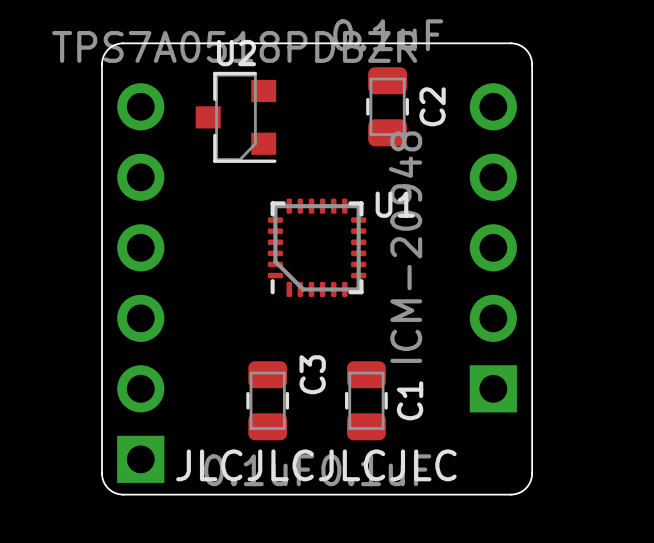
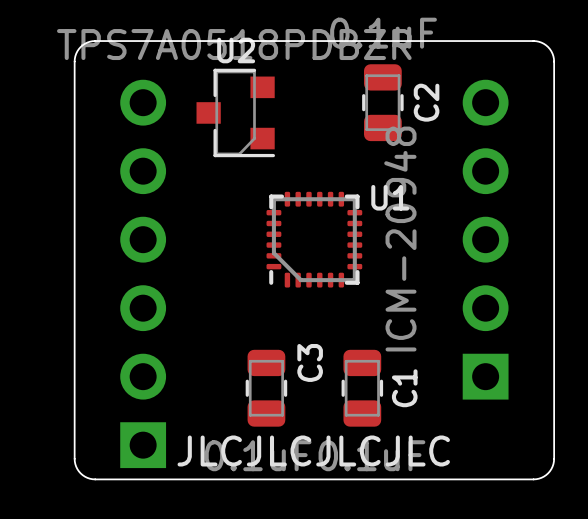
board edge: (123, 43) (115, 44) (108, 49) (103, 56) (101, 64) (101, 473) (103, 481) (108, 488) (115, 493) (123, 494) -> (126, 41) (87, 42) (78, 49) (74, 61) (74, 461) (78, 471) (87, 477) (126, 479)
board edge: (510, 43) (519, 44) (525, 49) (530, 56) (532, 64) (532, 473) (530, 481) (525, 488) (519, 493) (510, 494) -> (502, 41) (541, 42) (549, 49) (554, 61) (553, 461) (549, 471) (541, 477) (502, 479)

